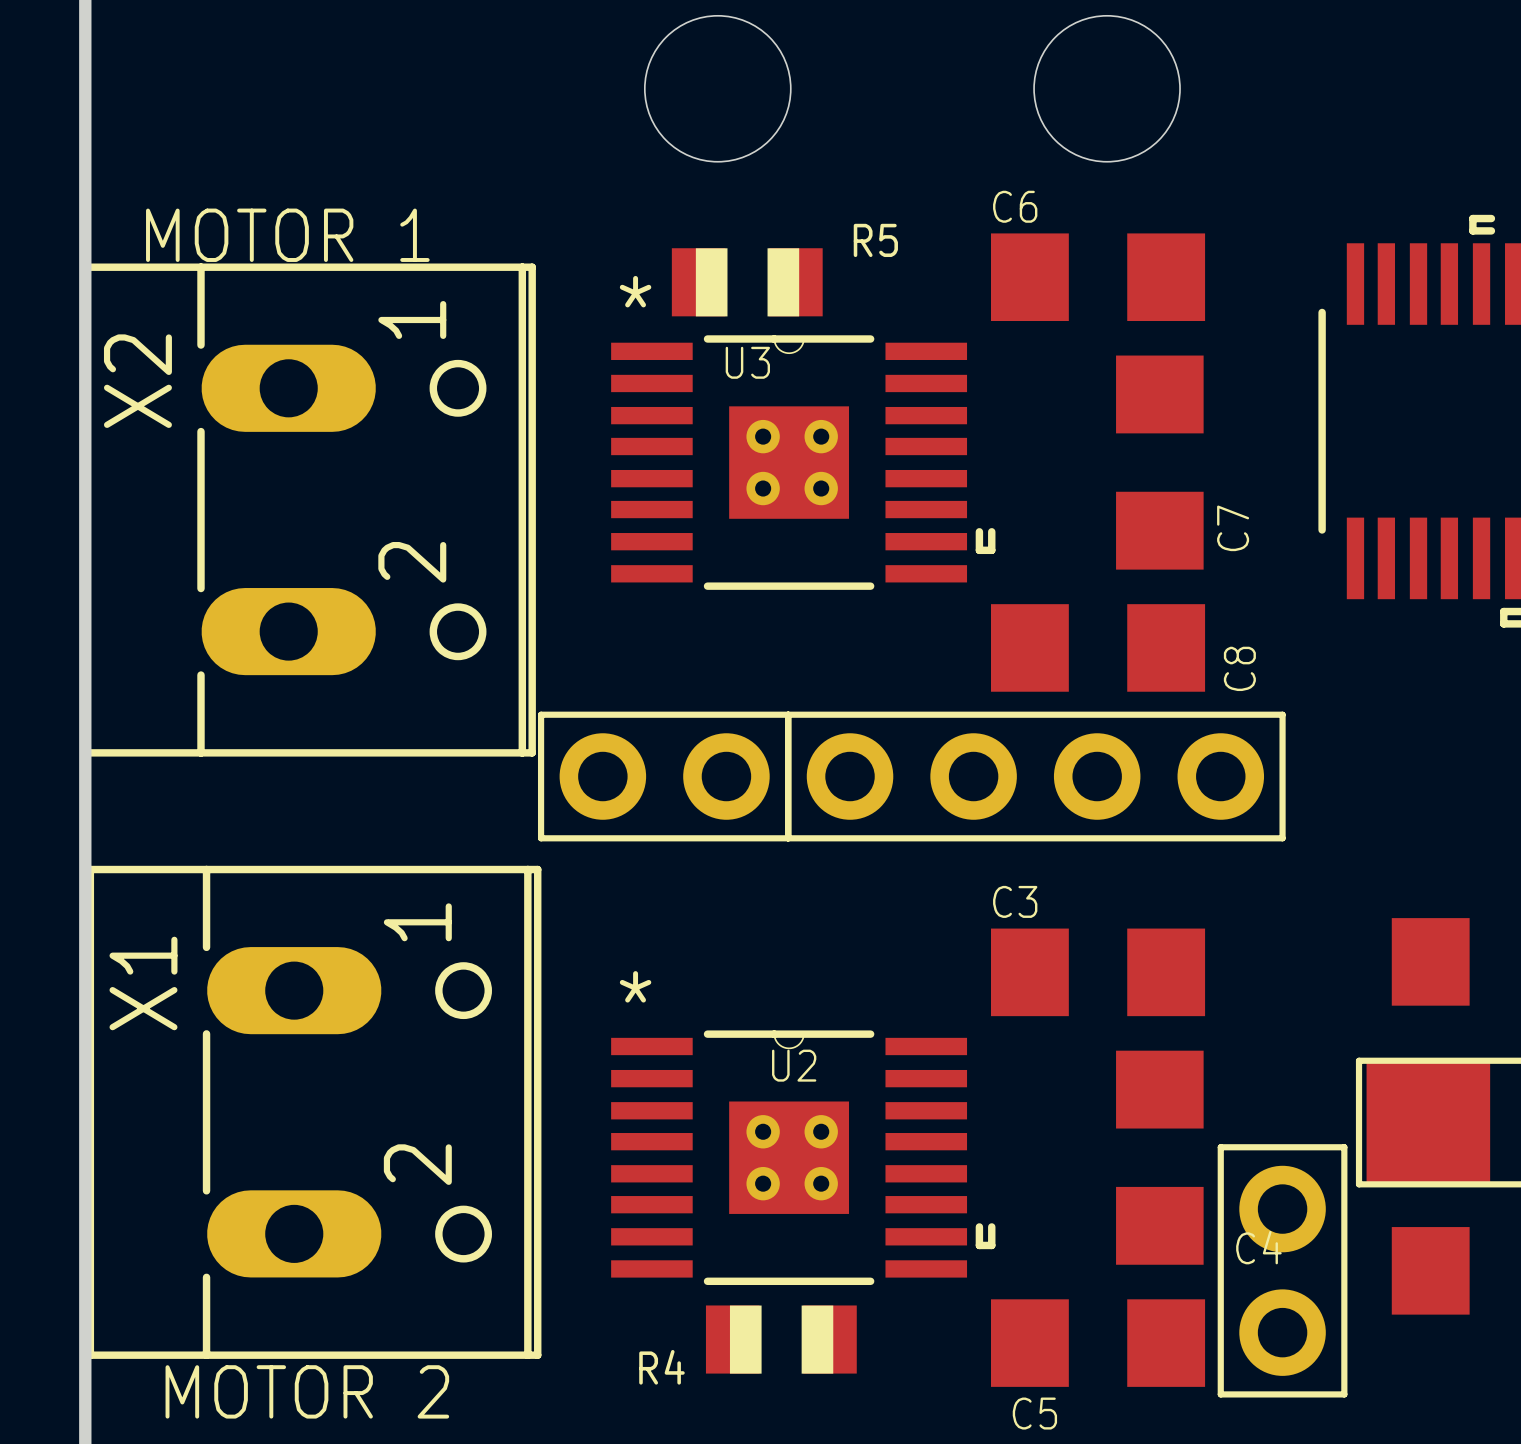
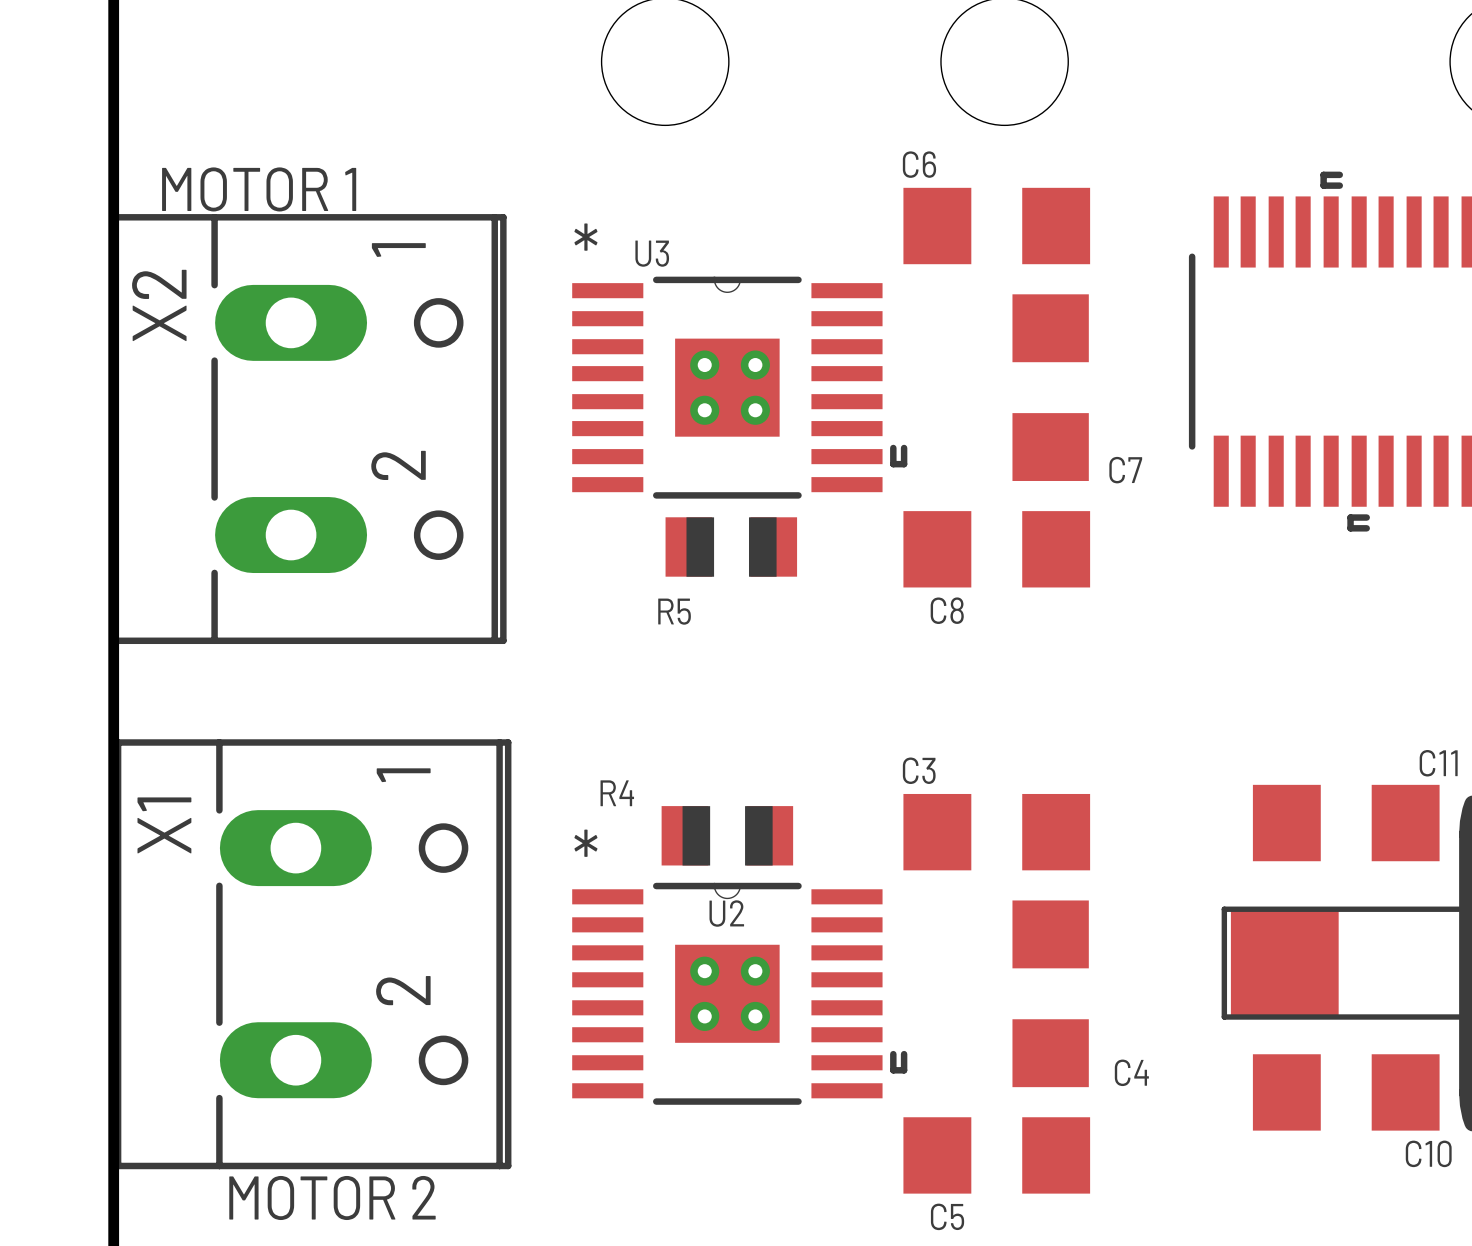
R5 name position: R5 (875, 240) -> R5 (674, 611)
R5 position: (747, 282) -> (731, 547)
U3 name position: U3 (747, 362) -> U3 (652, 253)
C7 name rotation: 0° (1233, 528) -> 90° clockwise (1125, 470)
C8 name rotation: 0° (1239, 668) -> 90° clockwise (947, 610)
C8 name position: C8 (1239, 668) -> C8 (947, 610)
part: (664, 776) -> none
part: (1035, 776) -> none
part: (1282, 1270) -> none
R4 position: (781, 1339) -> (727, 835)
R4 name position: R4 (661, 1367) -> R4 (617, 793)

